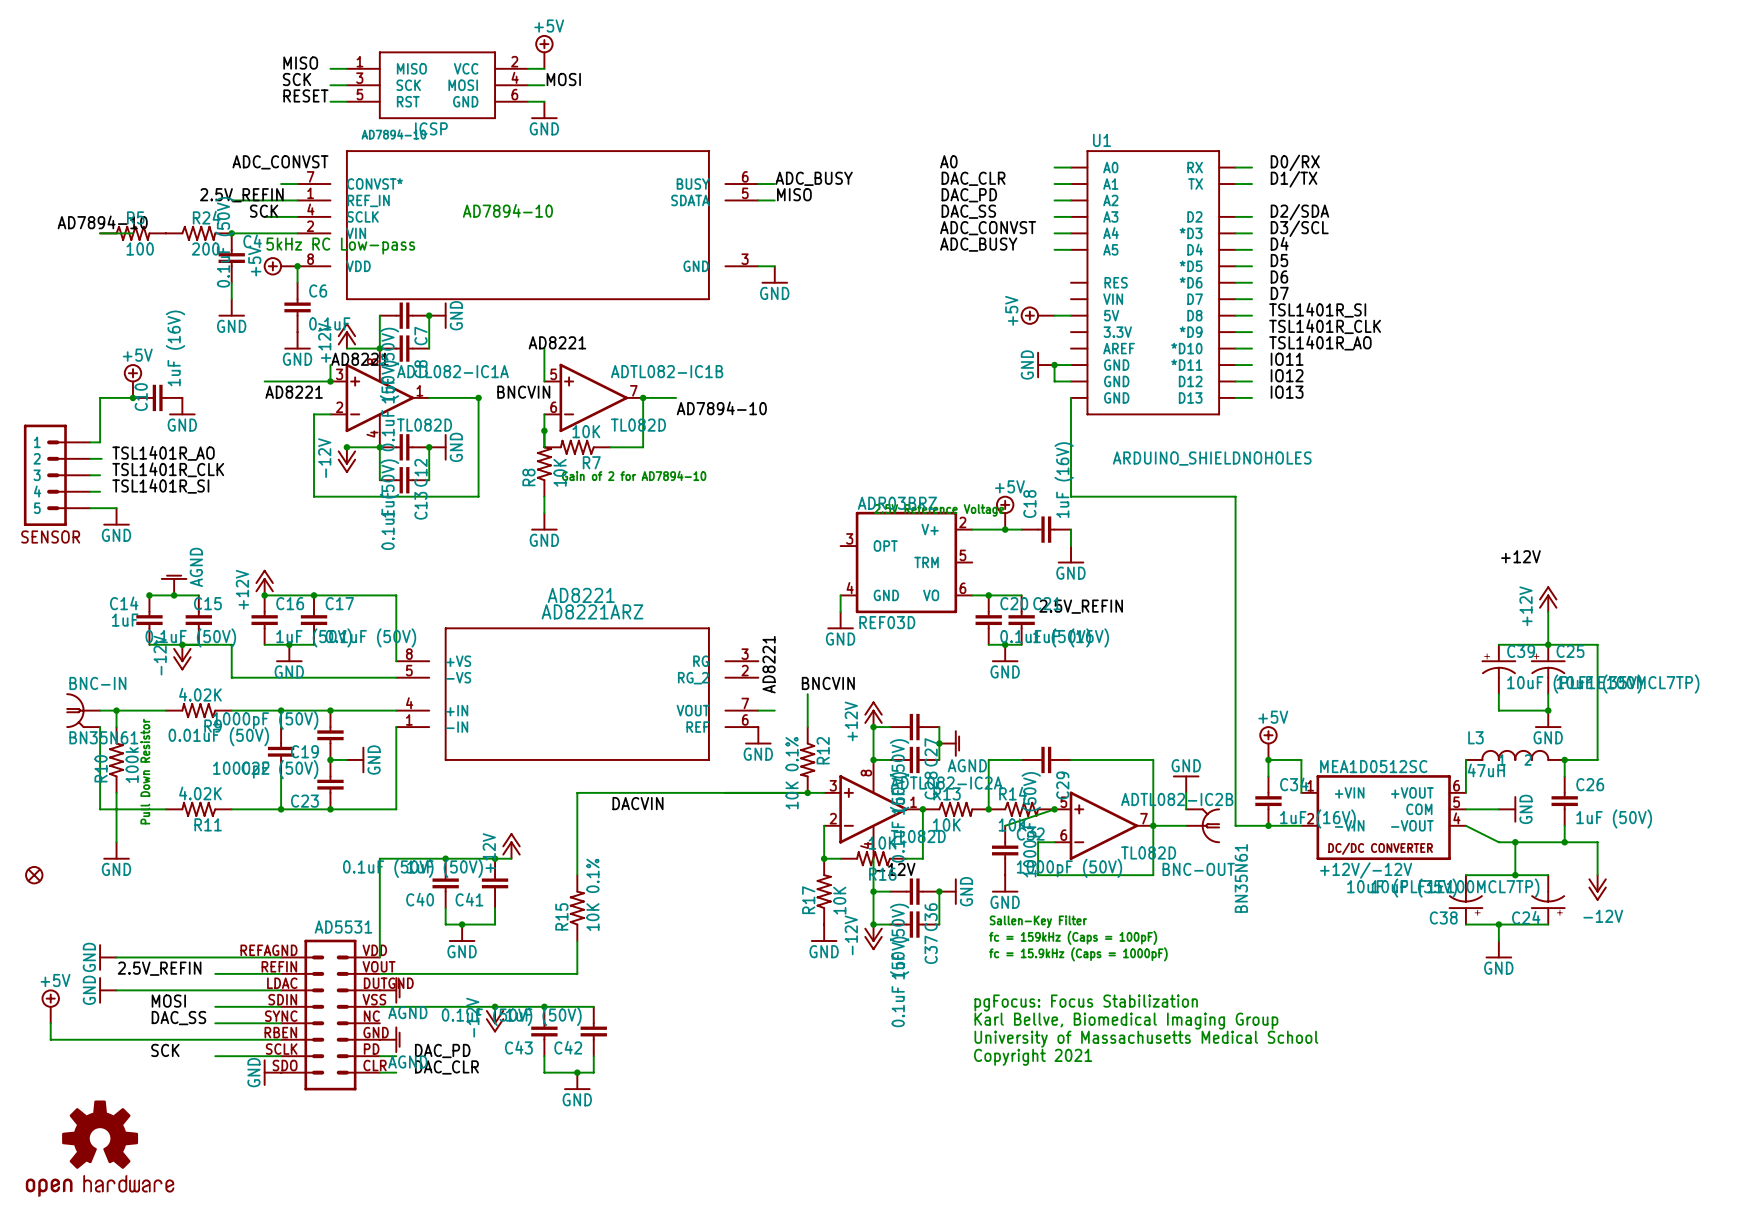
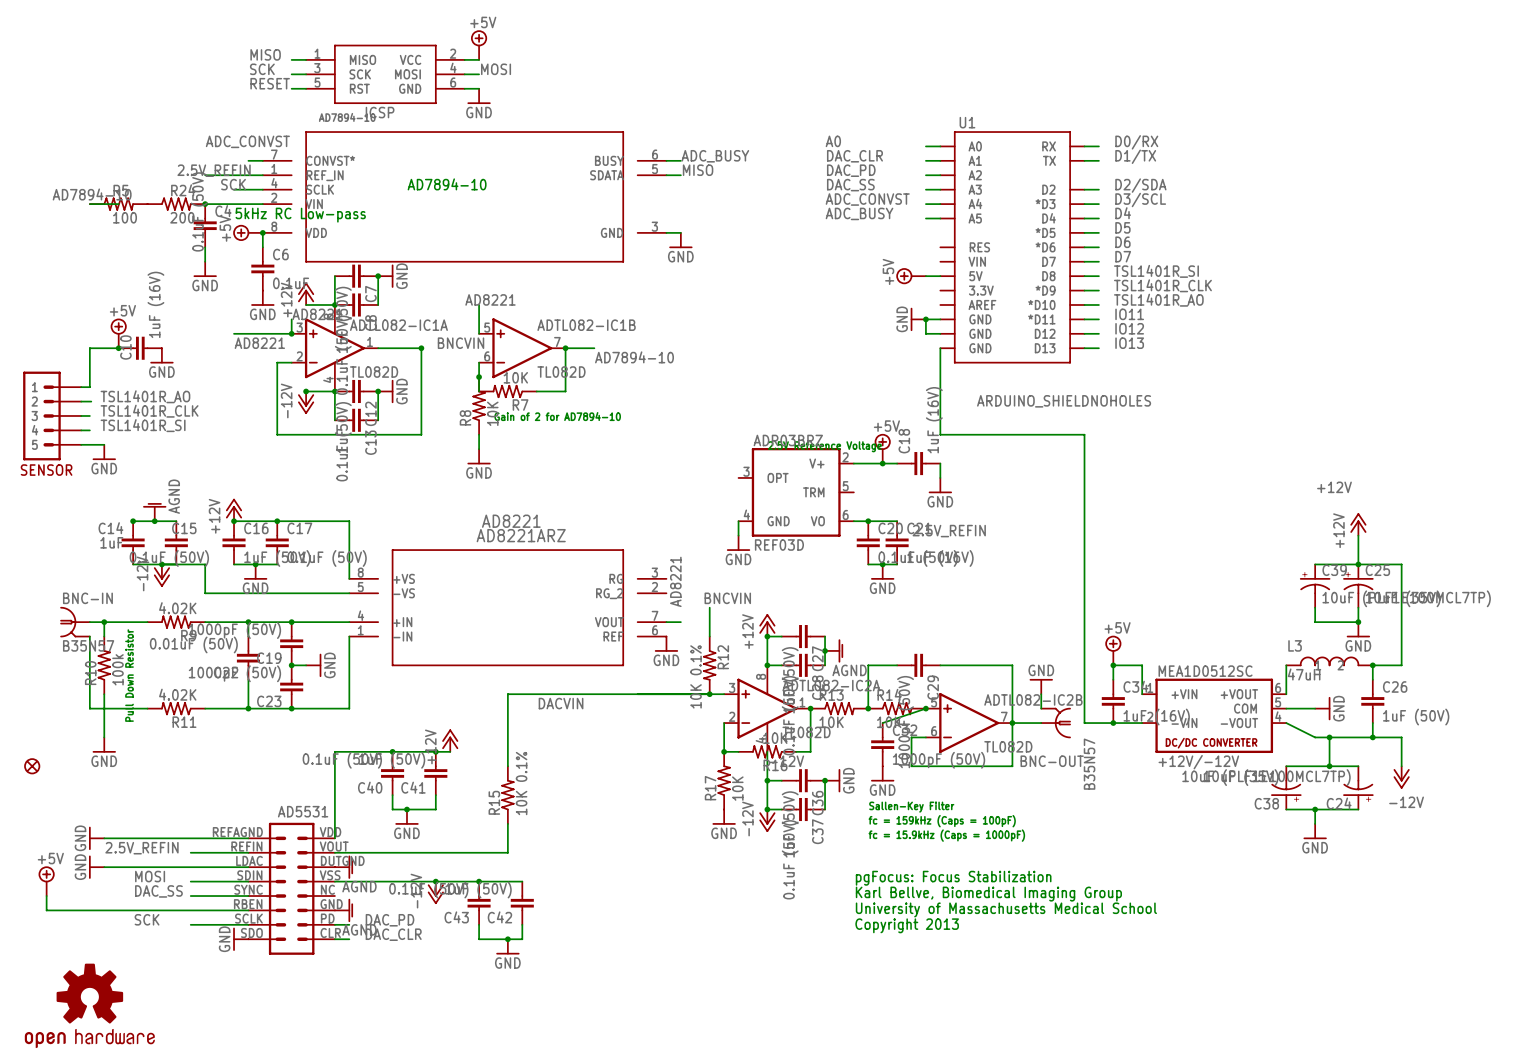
BNC-IN value: BN35N61 (103, 737) -> B35N57 (88, 645)
BNC-OUT value: BN35N61 (1241, 878) -> B35N57 (1089, 764)
text: Copyright 2021 (1033, 1057) -> Copyright 2013 (907, 925)

